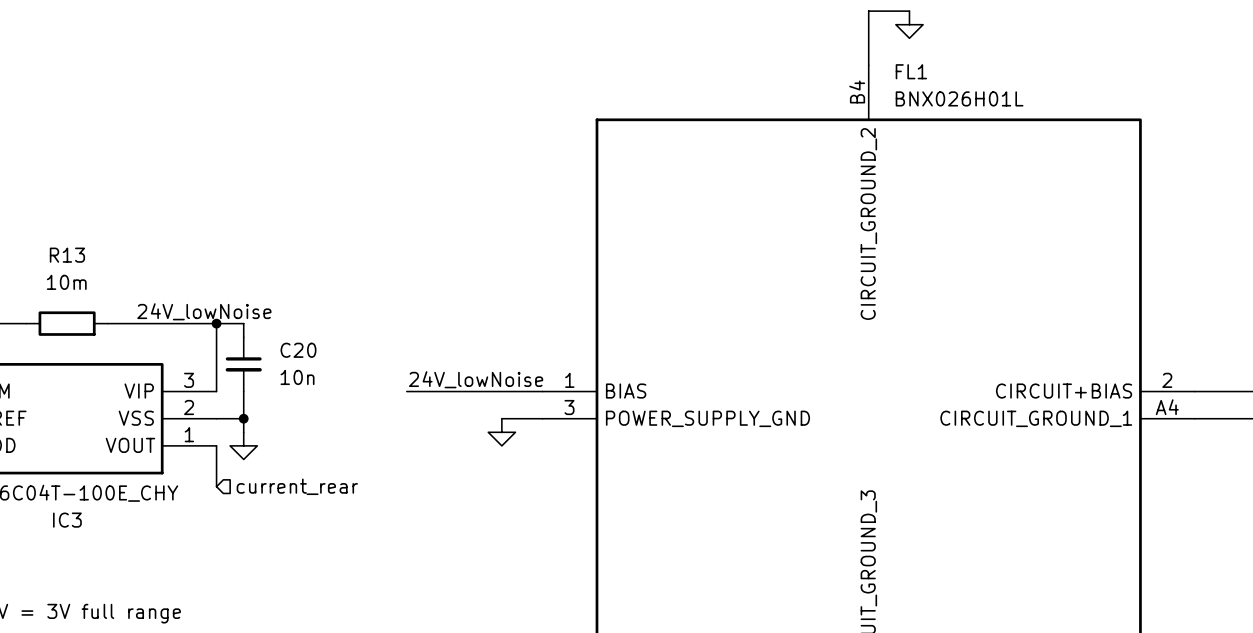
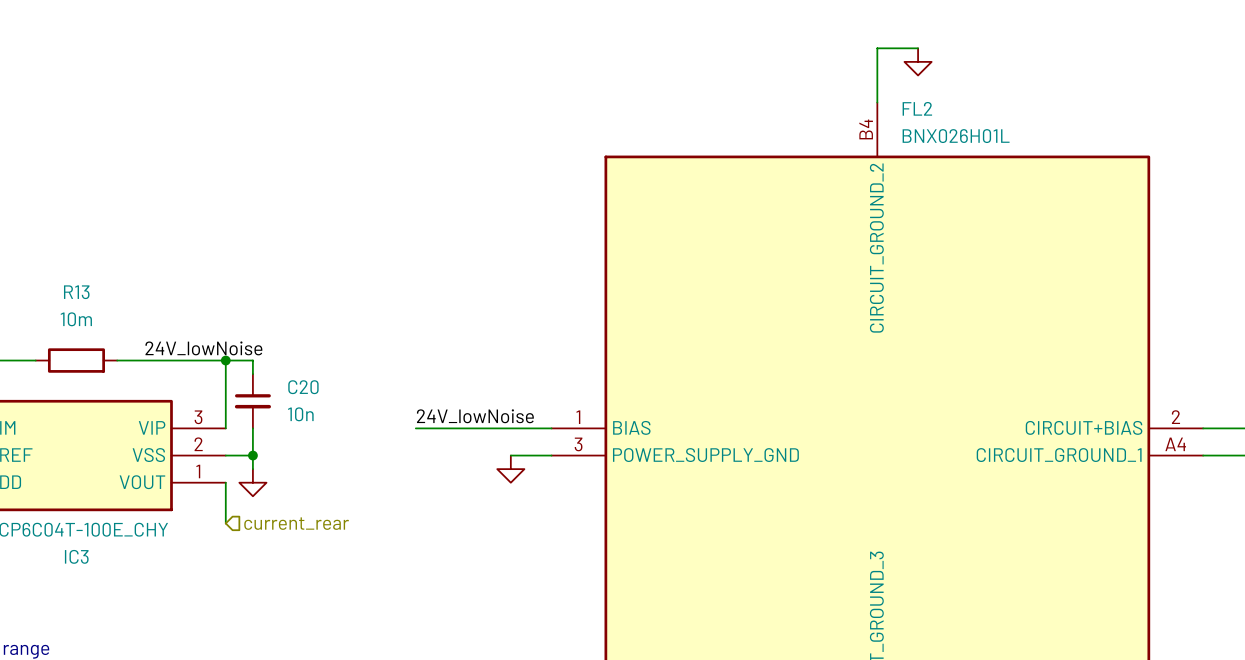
FL1 name: FL1 (911, 71) -> FL2 (917, 108)

